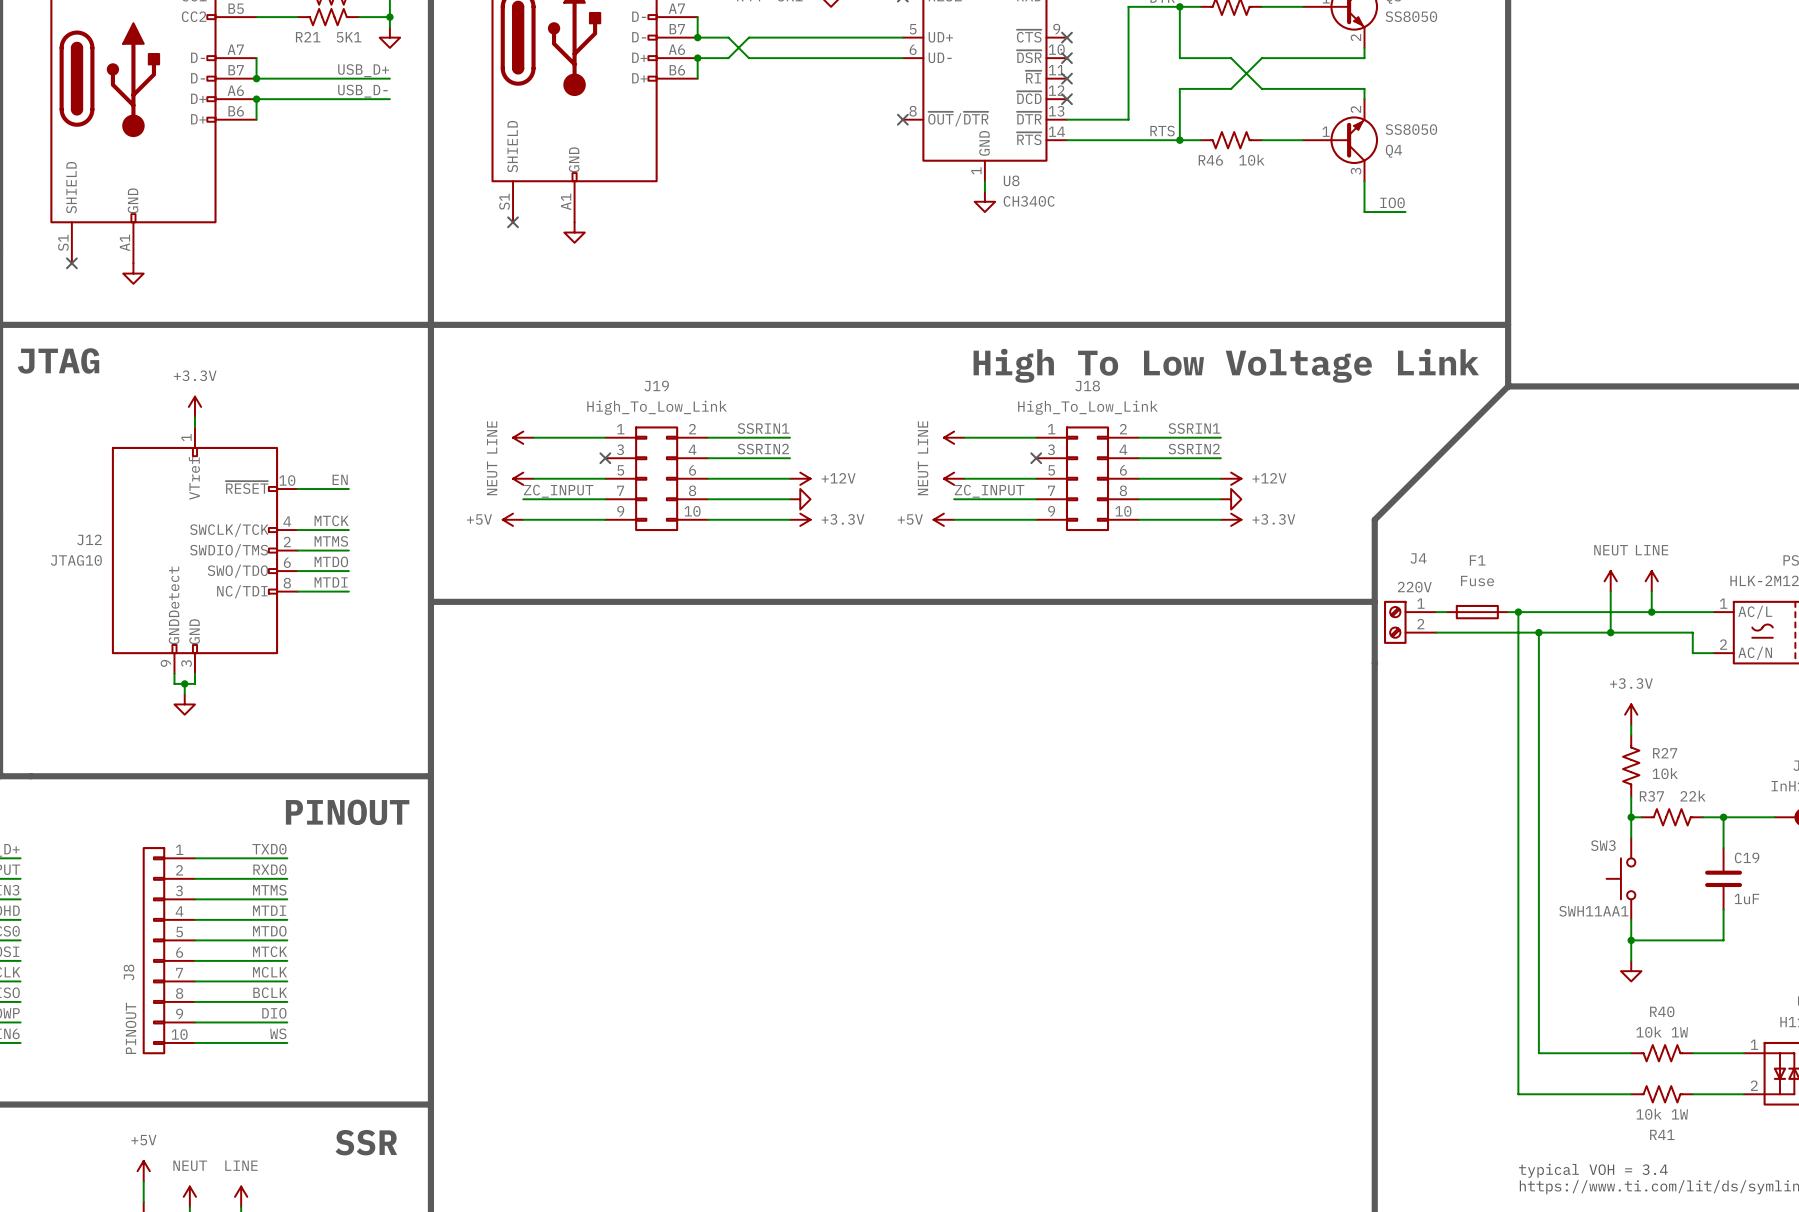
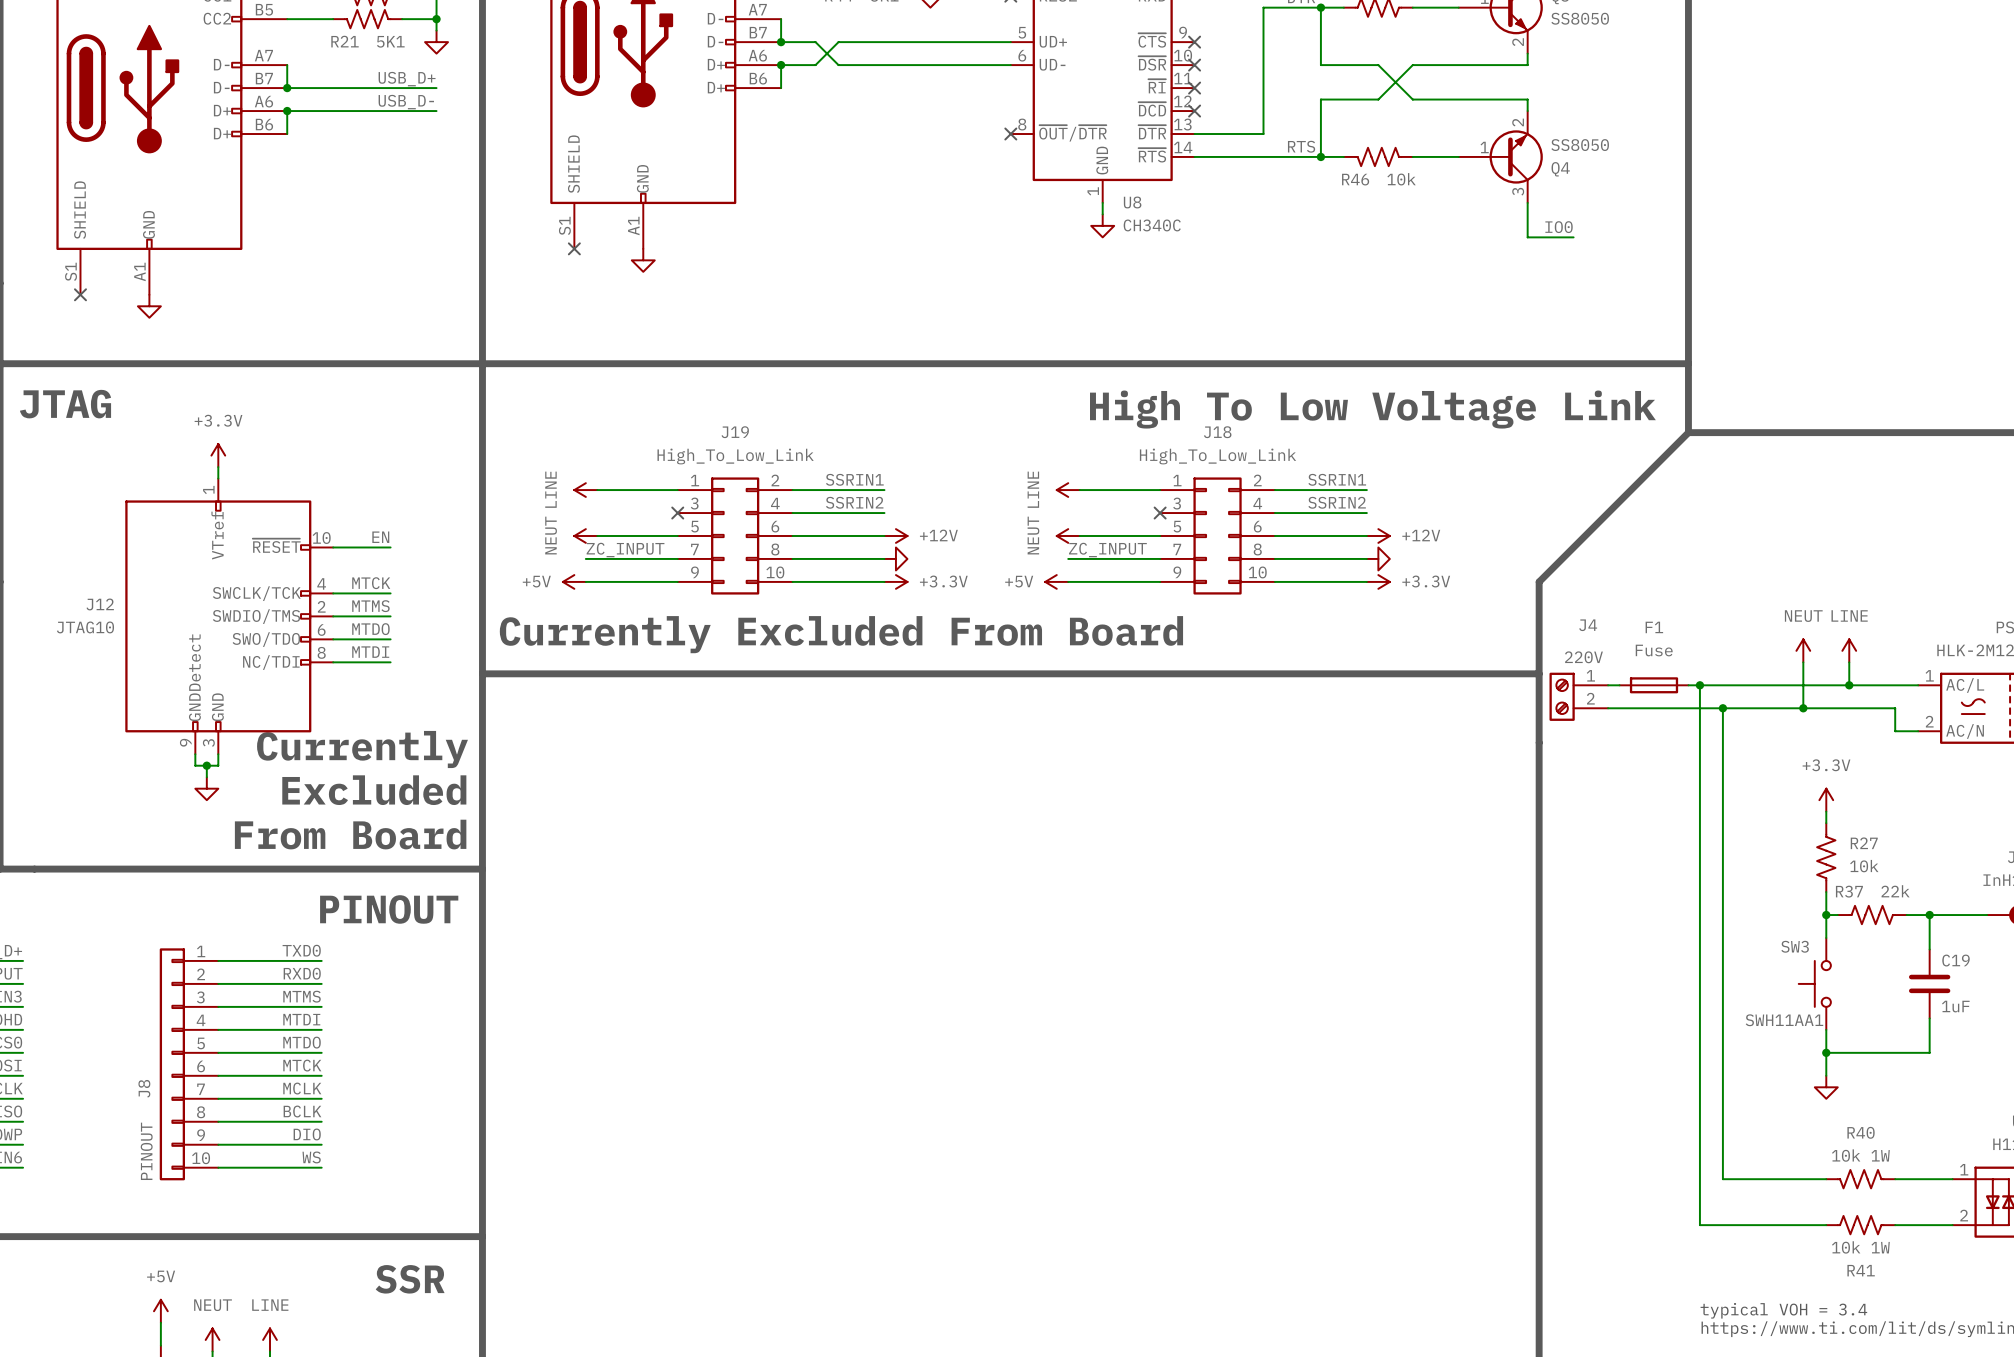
text: none -> Currently Excluded From Board (841, 634)
text: none -> Currently (362, 749)
text: none -> Excluded (374, 790)
text: none -> From Board (350, 834)

